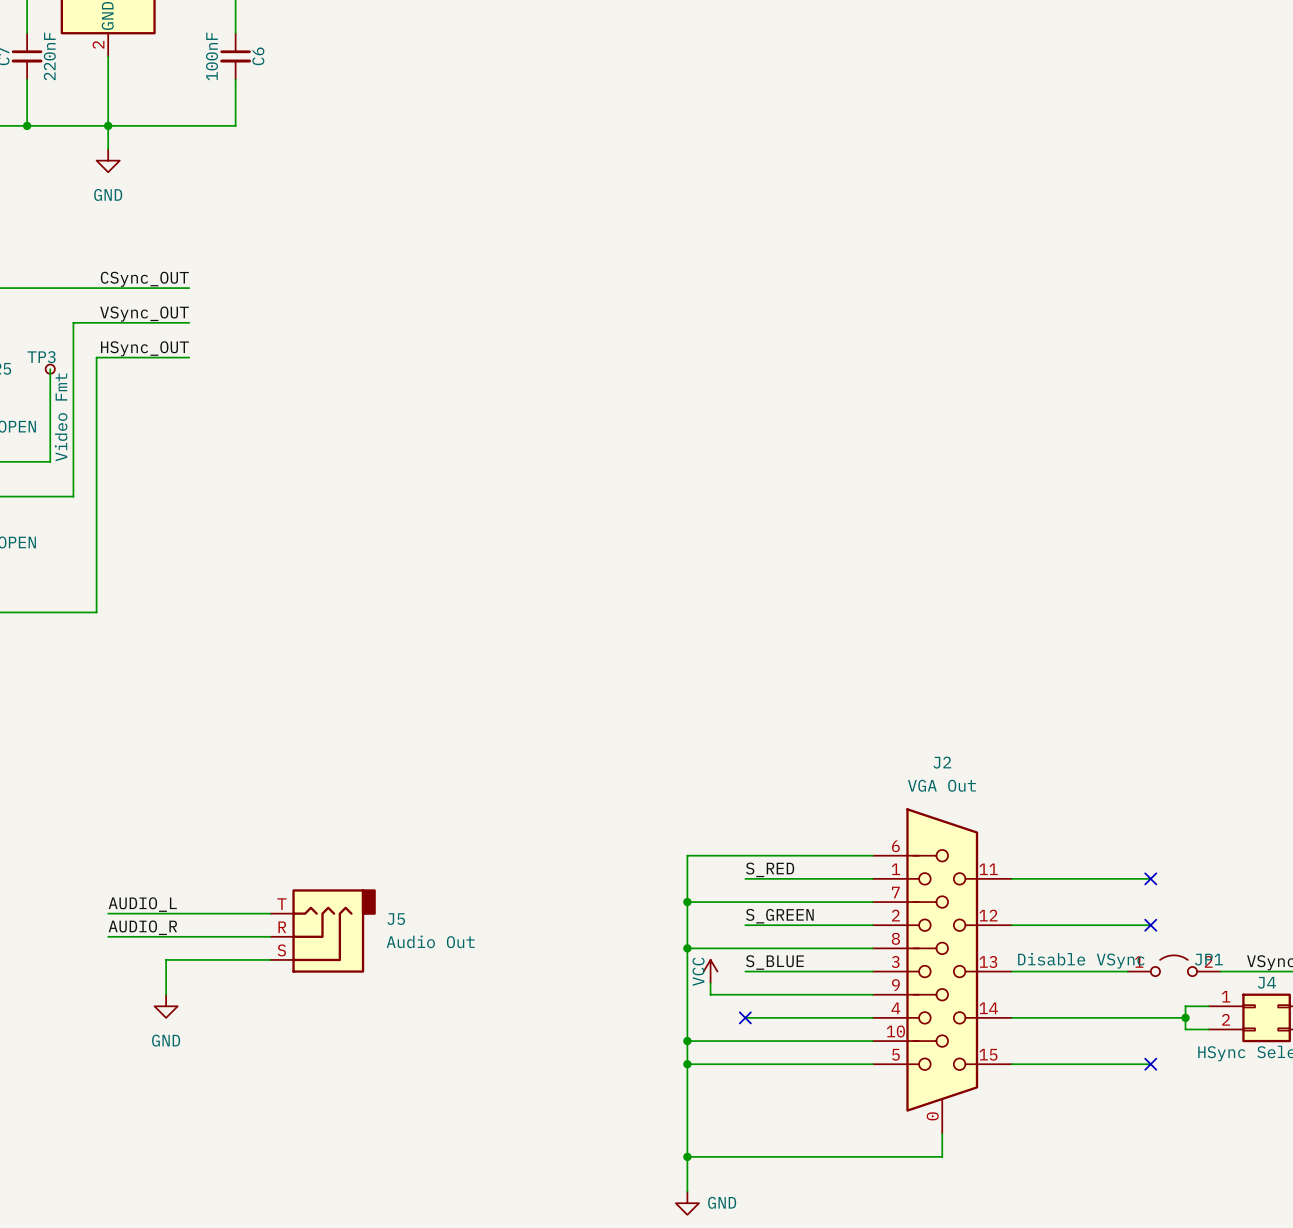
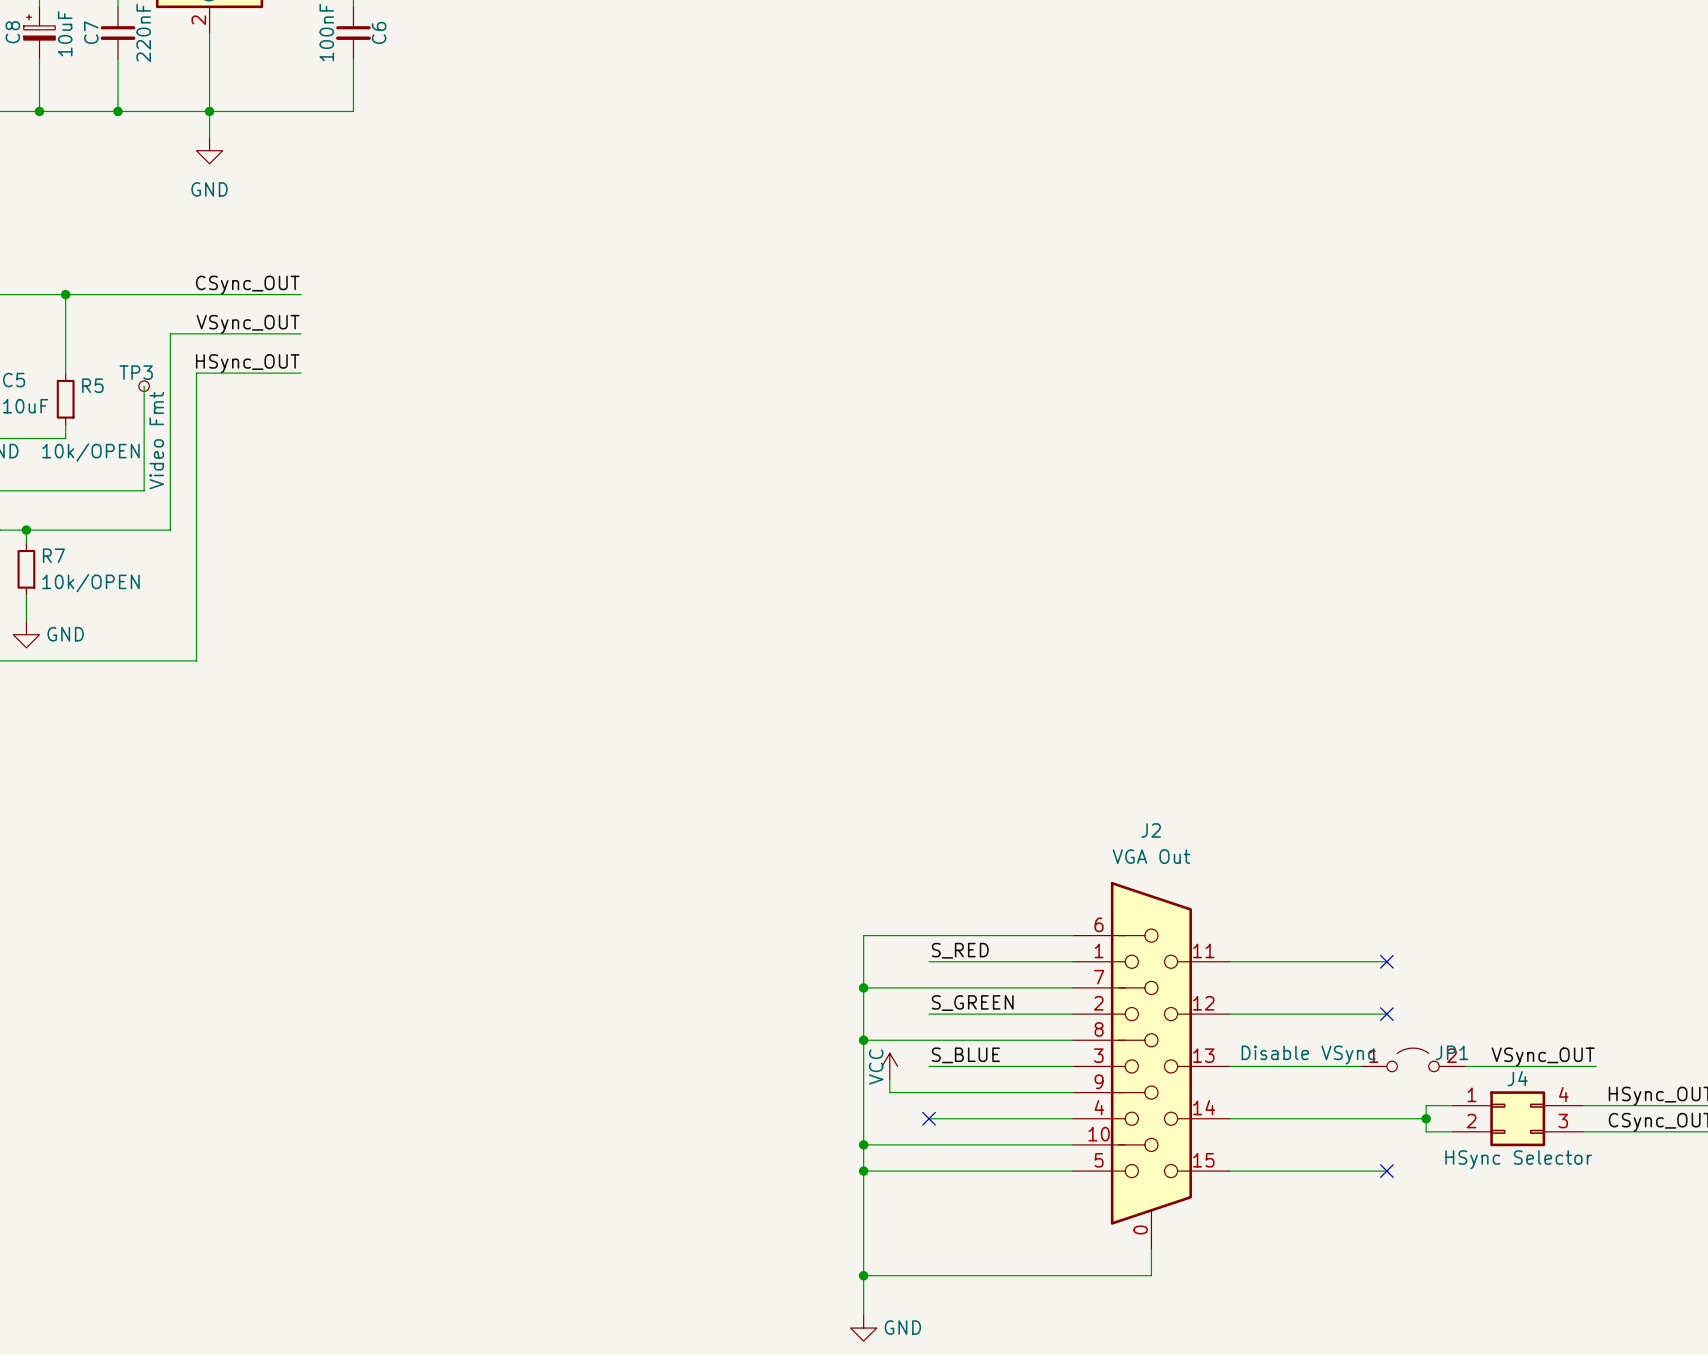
label: AUDIO_L (142, 904) -> none
wire: (108, 913) (270, 913) -> none
label: AUDIO_R (142, 927) -> none
J5: Audio Out (323, 931) -> none
wire: (108, 936) (270, 936) -> none
wire: (270, 959) (166, 959) (166, 994) -> none
power symbol: GND (166, 1006) -> none

